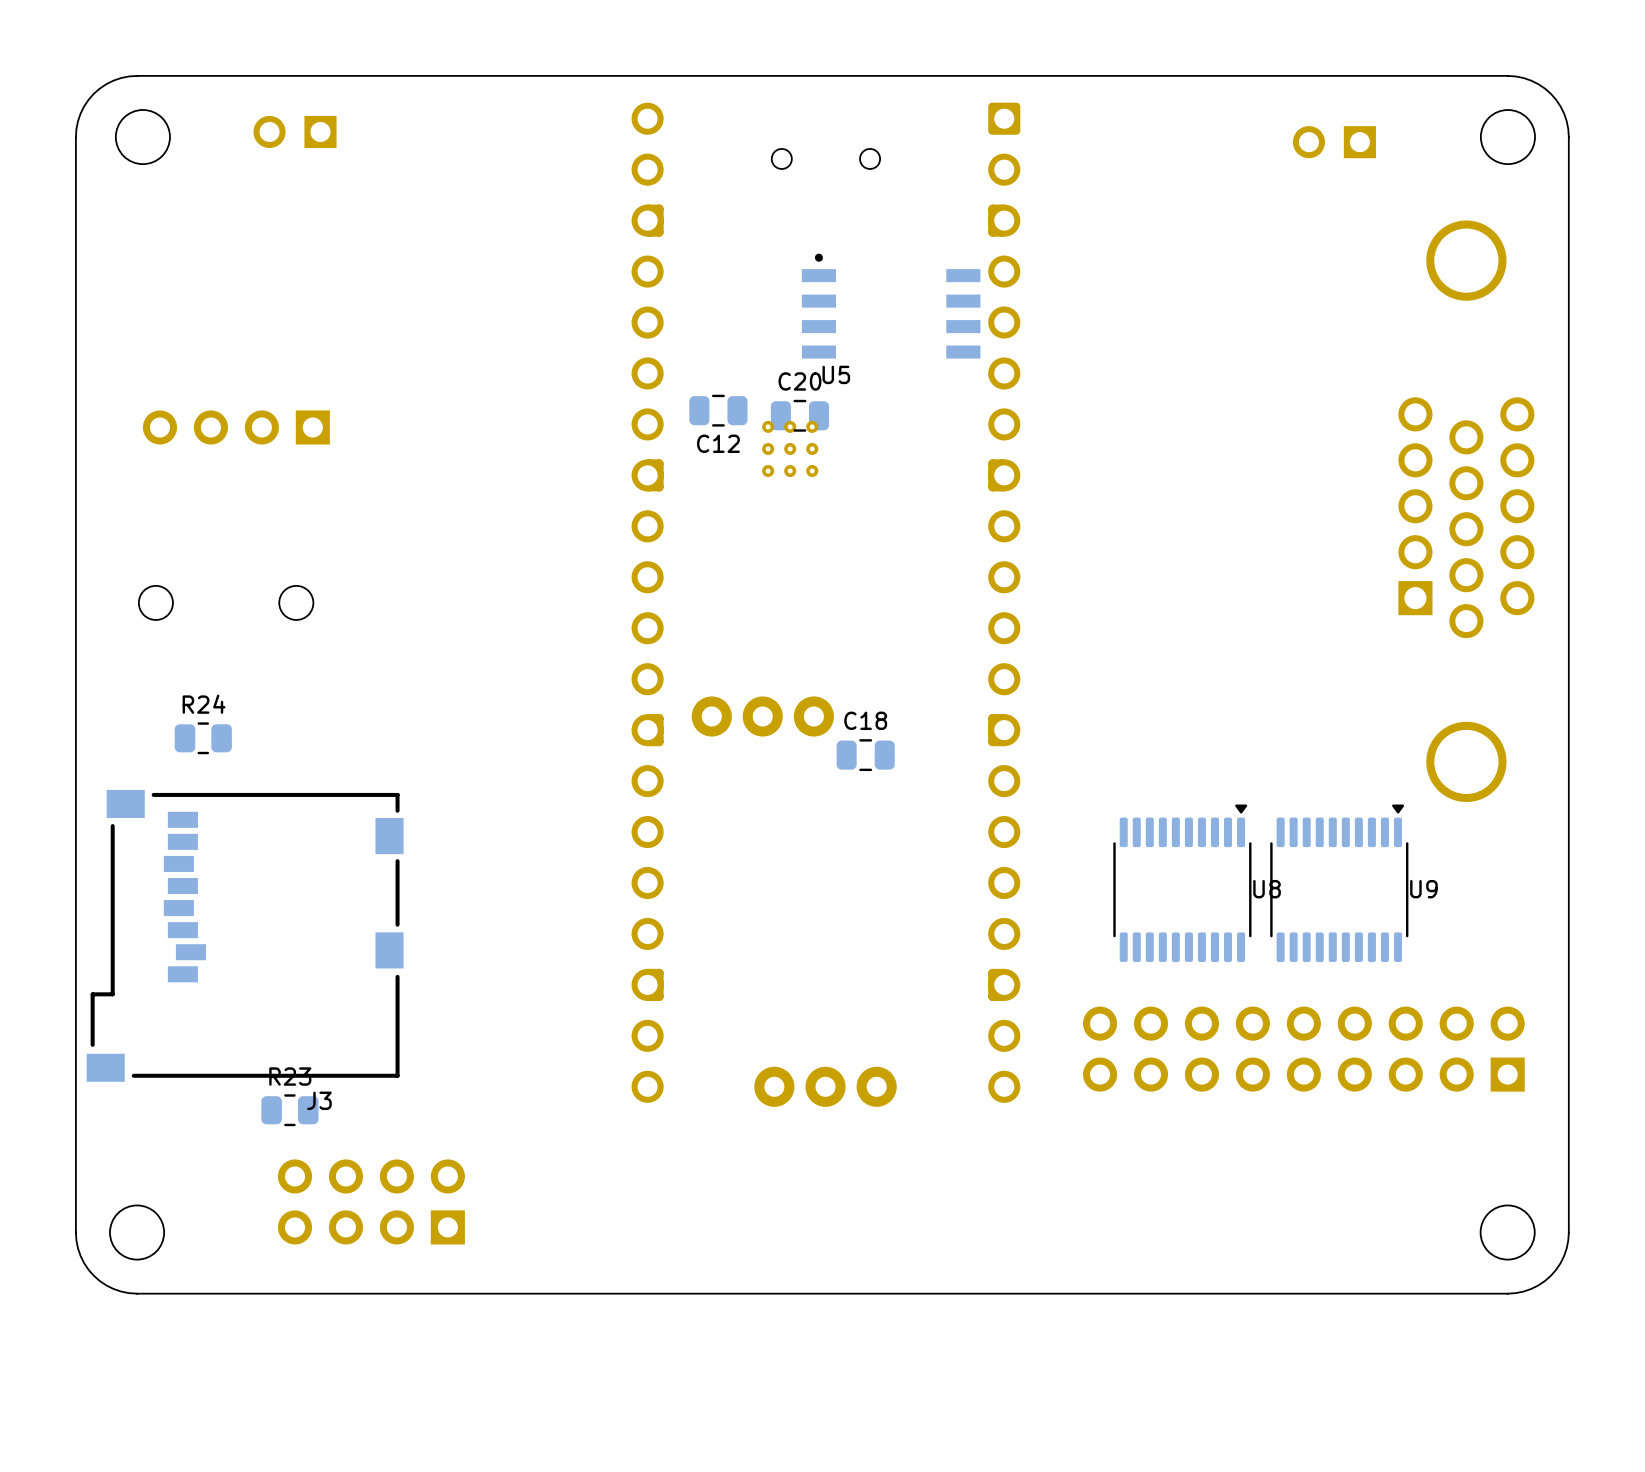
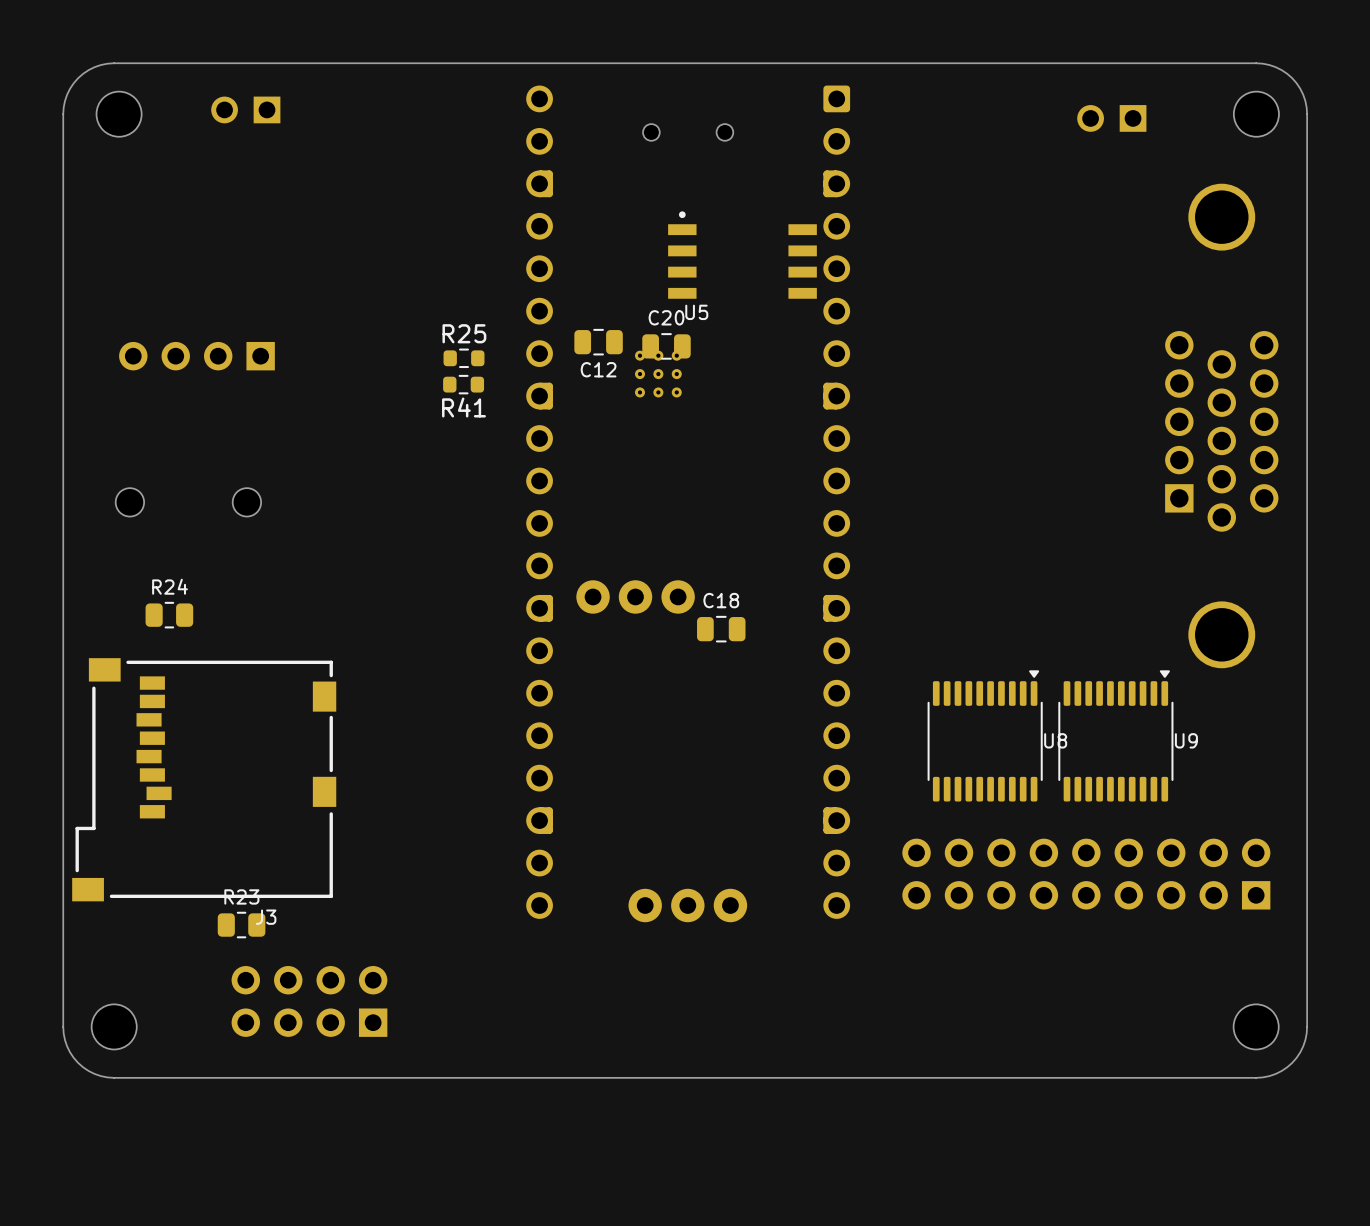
R25: none -> (464, 358)
R41: none -> (463, 384)

